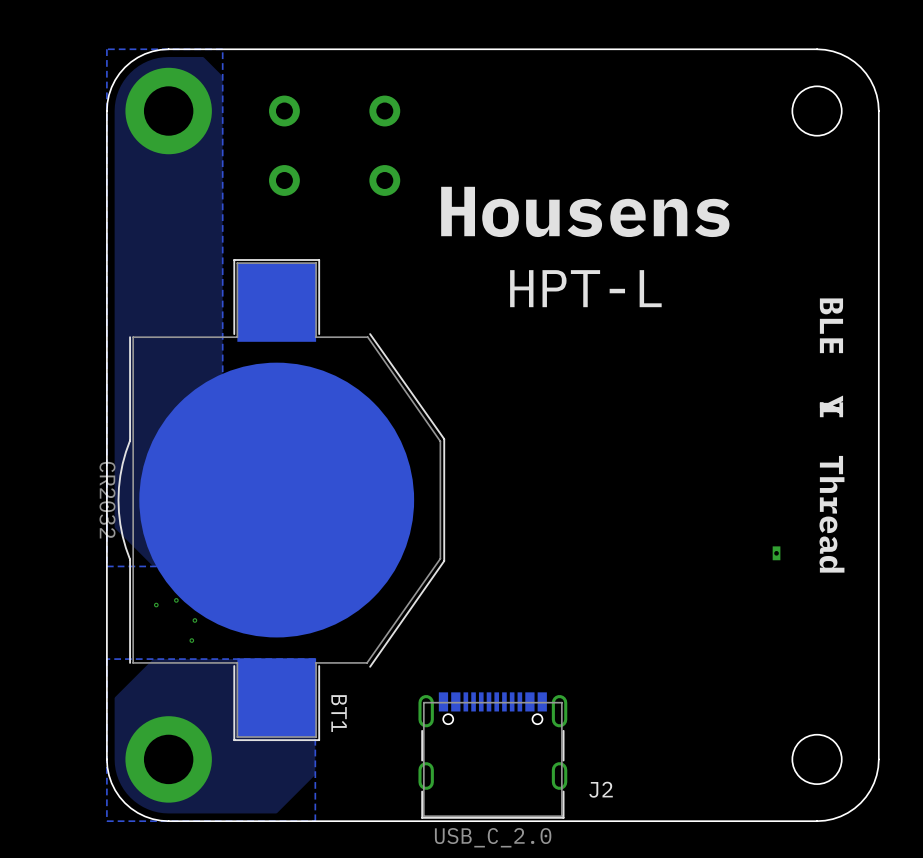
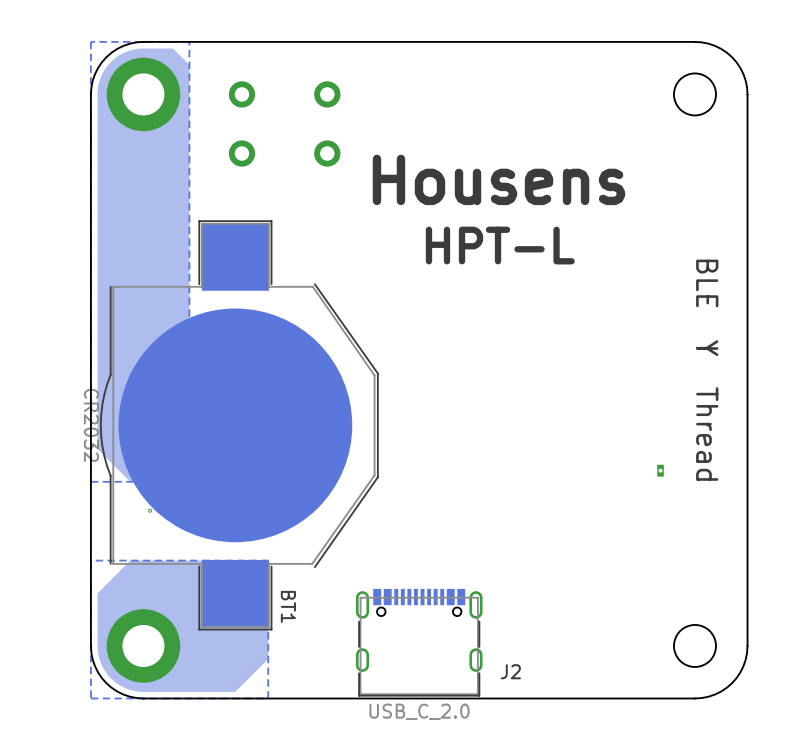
via: (156, 605) -> none
via: (194, 620) -> none
via: (191, 640) -> none

